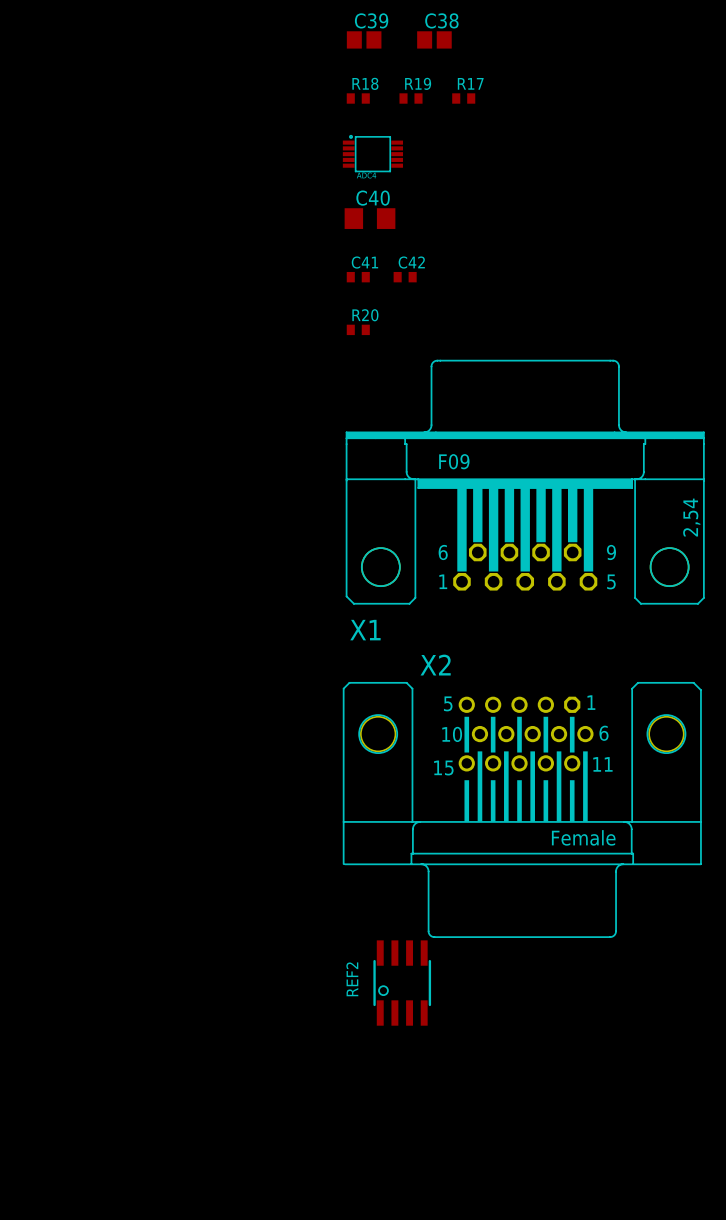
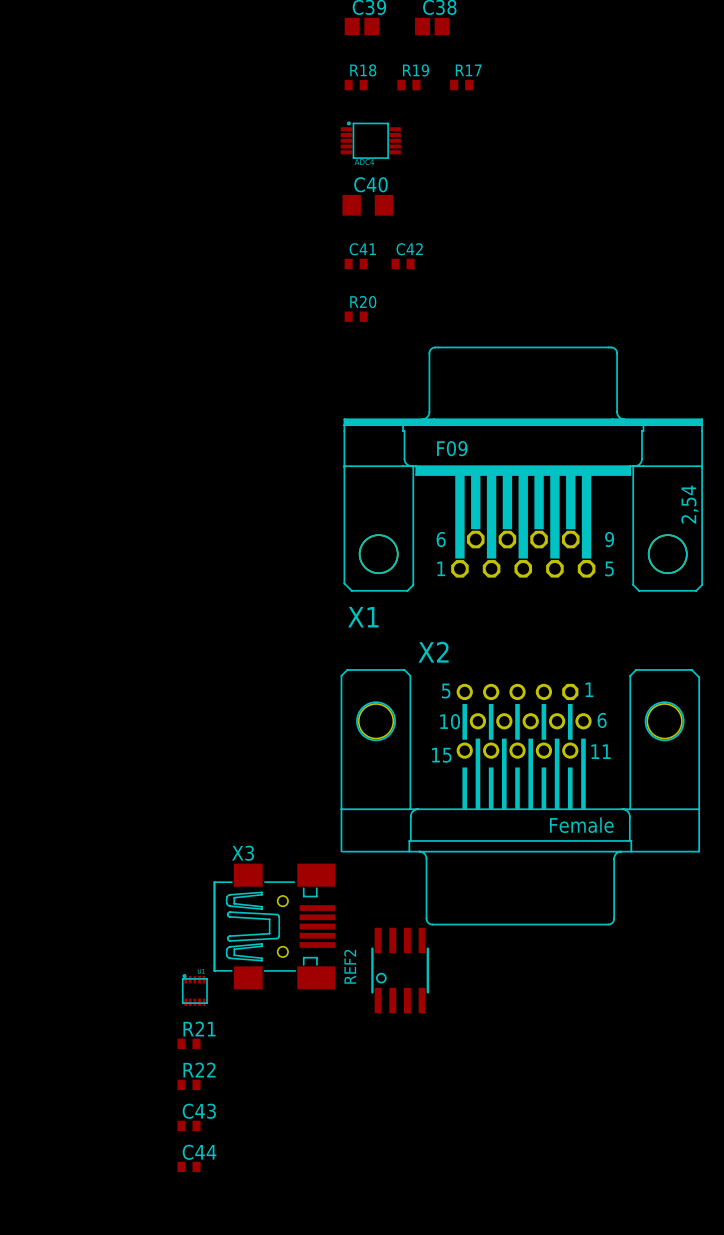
X3: none -> (274, 926)
part: none -> (194, 990)
R21: none -> (189, 1043)
R22: none -> (189, 1084)
C43: none -> (189, 1125)
C44: none -> (189, 1166)

